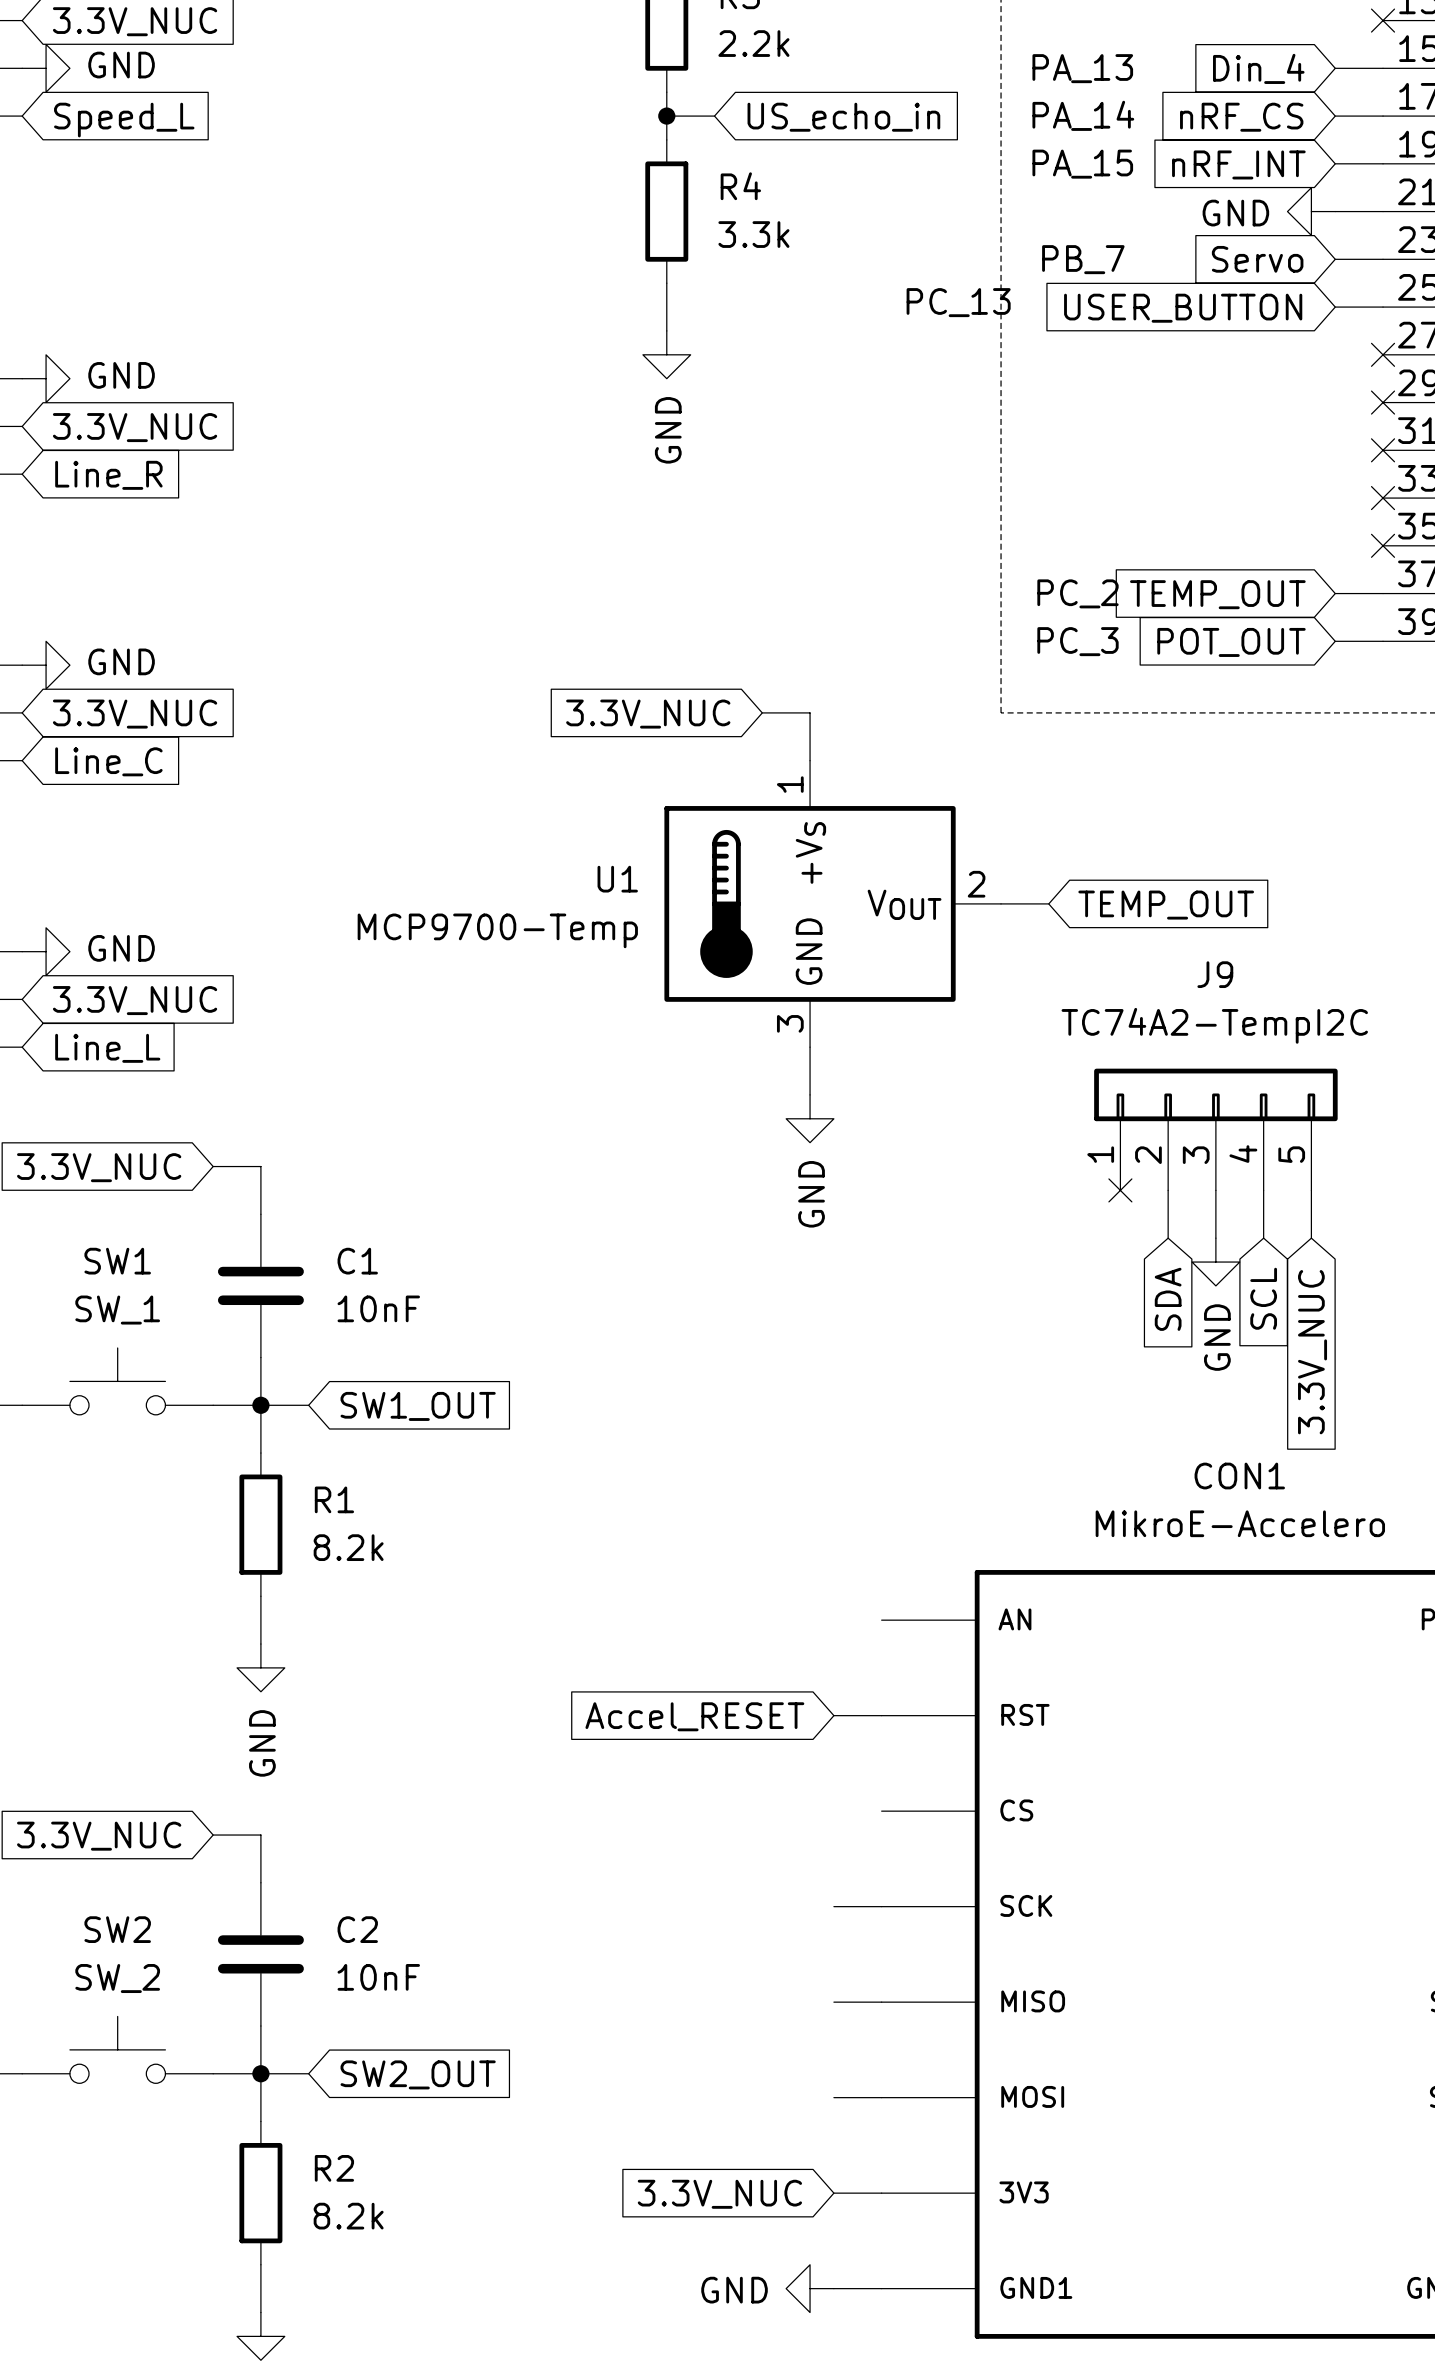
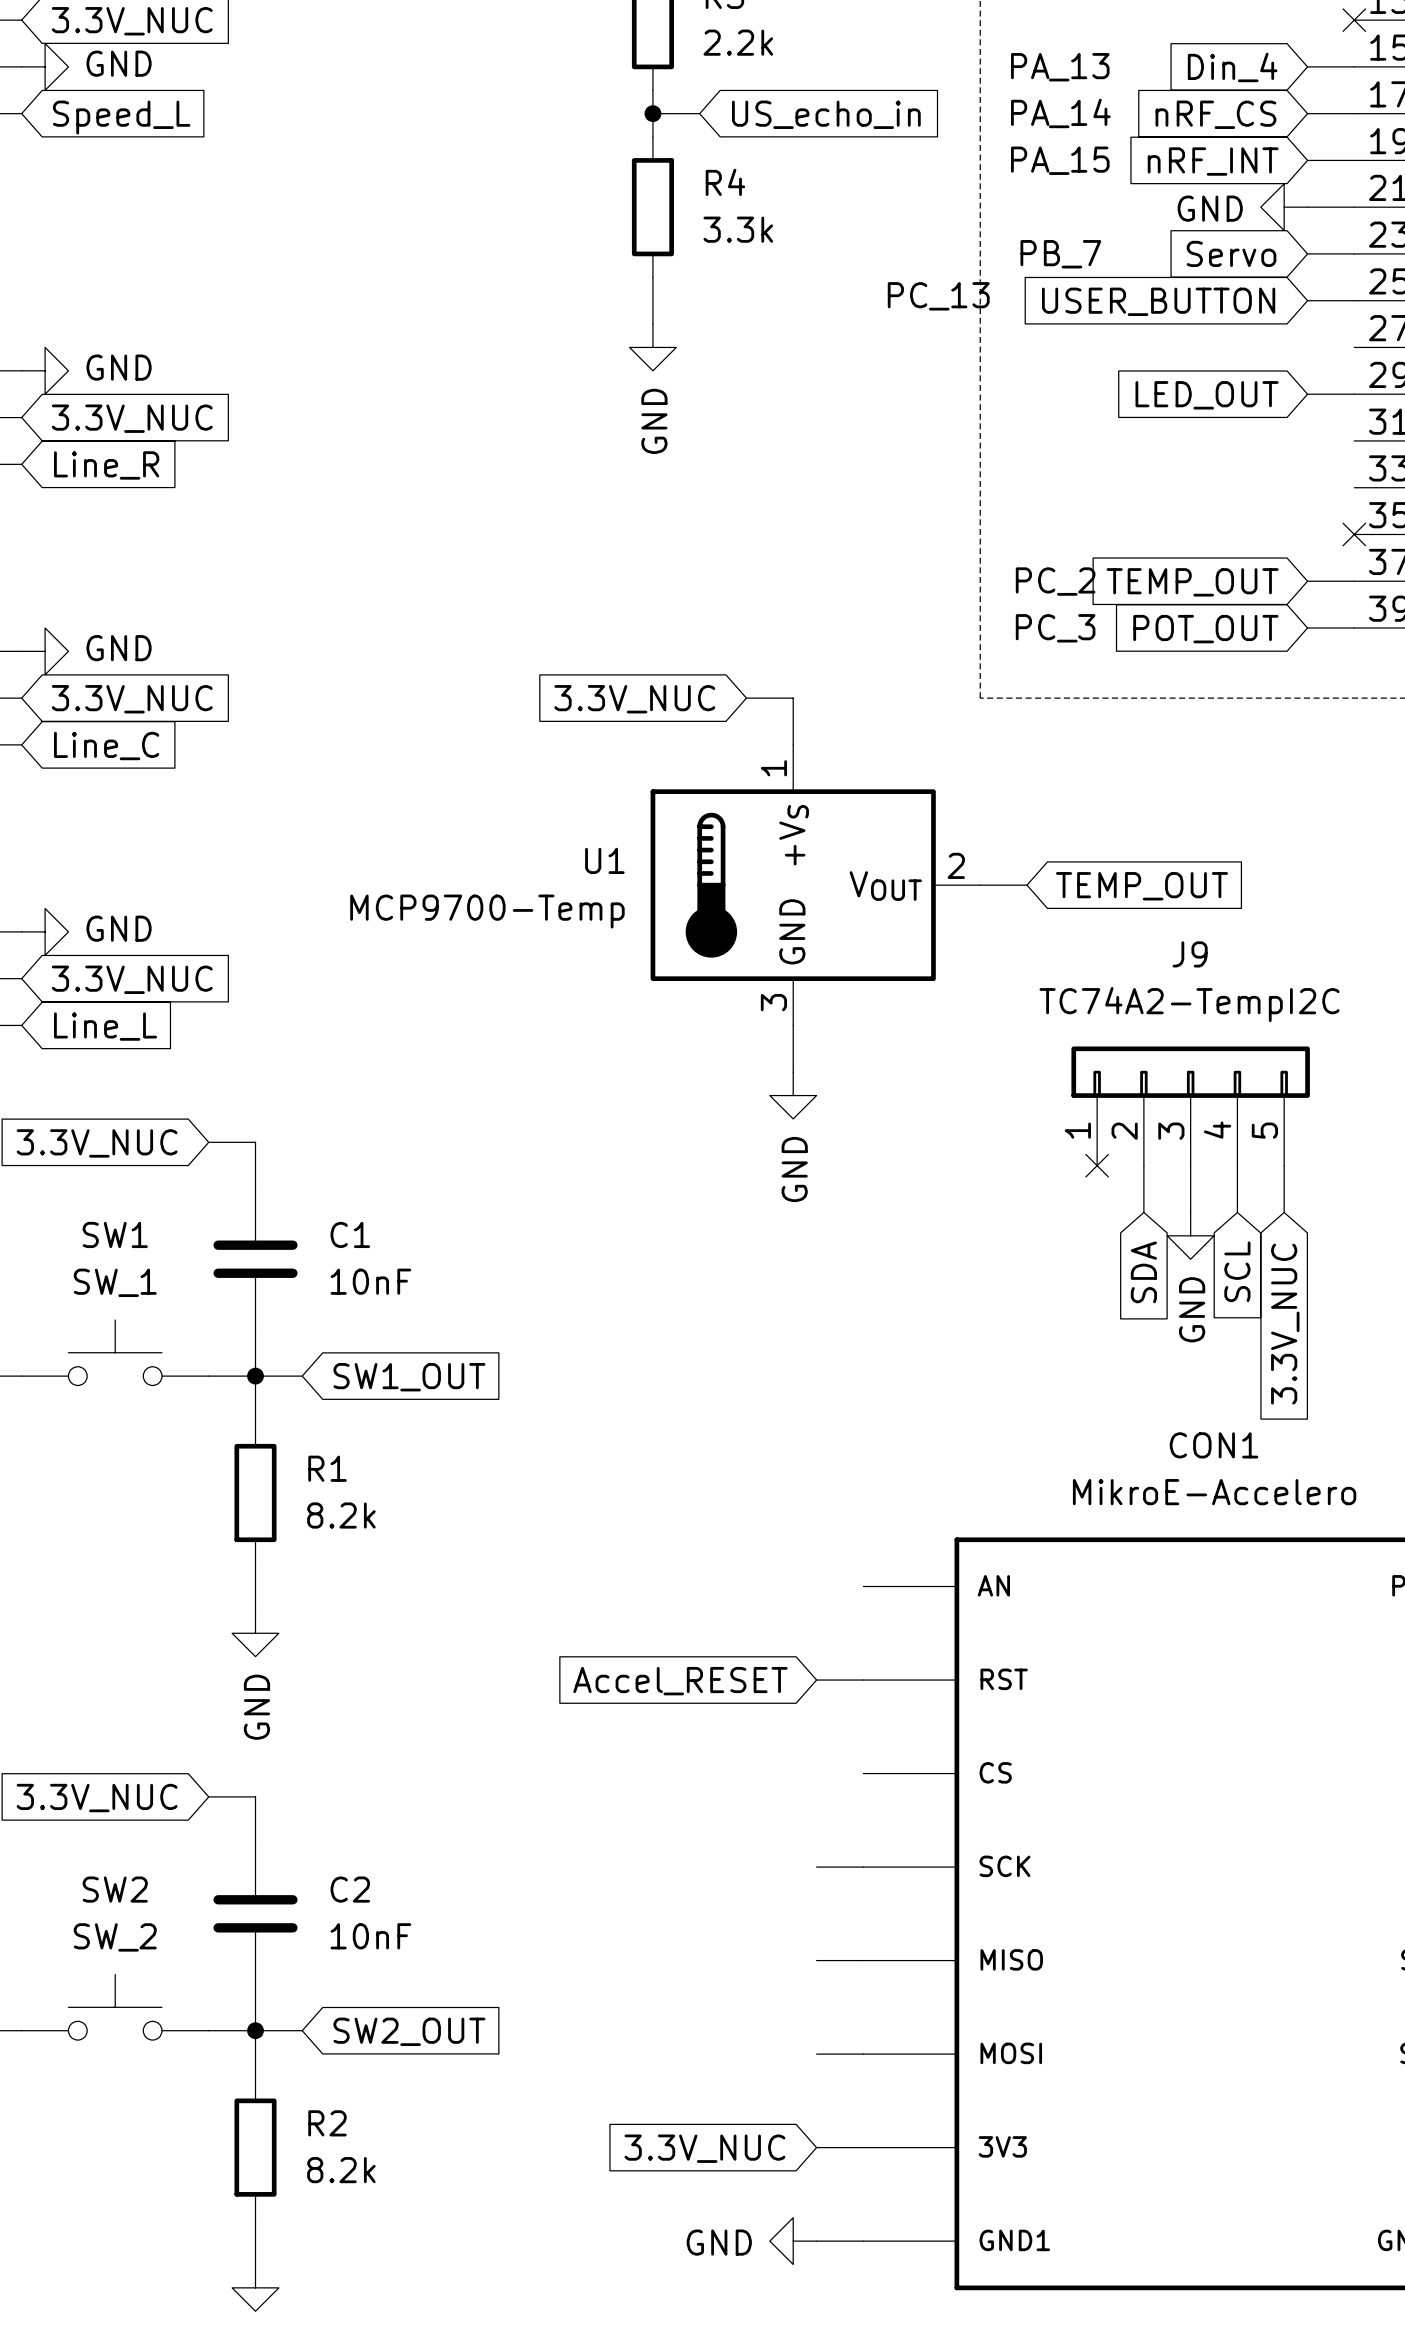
no-connect mark: (1383, 354) -> none
wire: none -> (1307, 394) (1354, 394)
no-connect mark: (1383, 402) -> none
global label: none -> LED_OUT (1207, 395)
no-connect mark: (1383, 450) -> none
no-connect mark: (1383, 498) -> none

